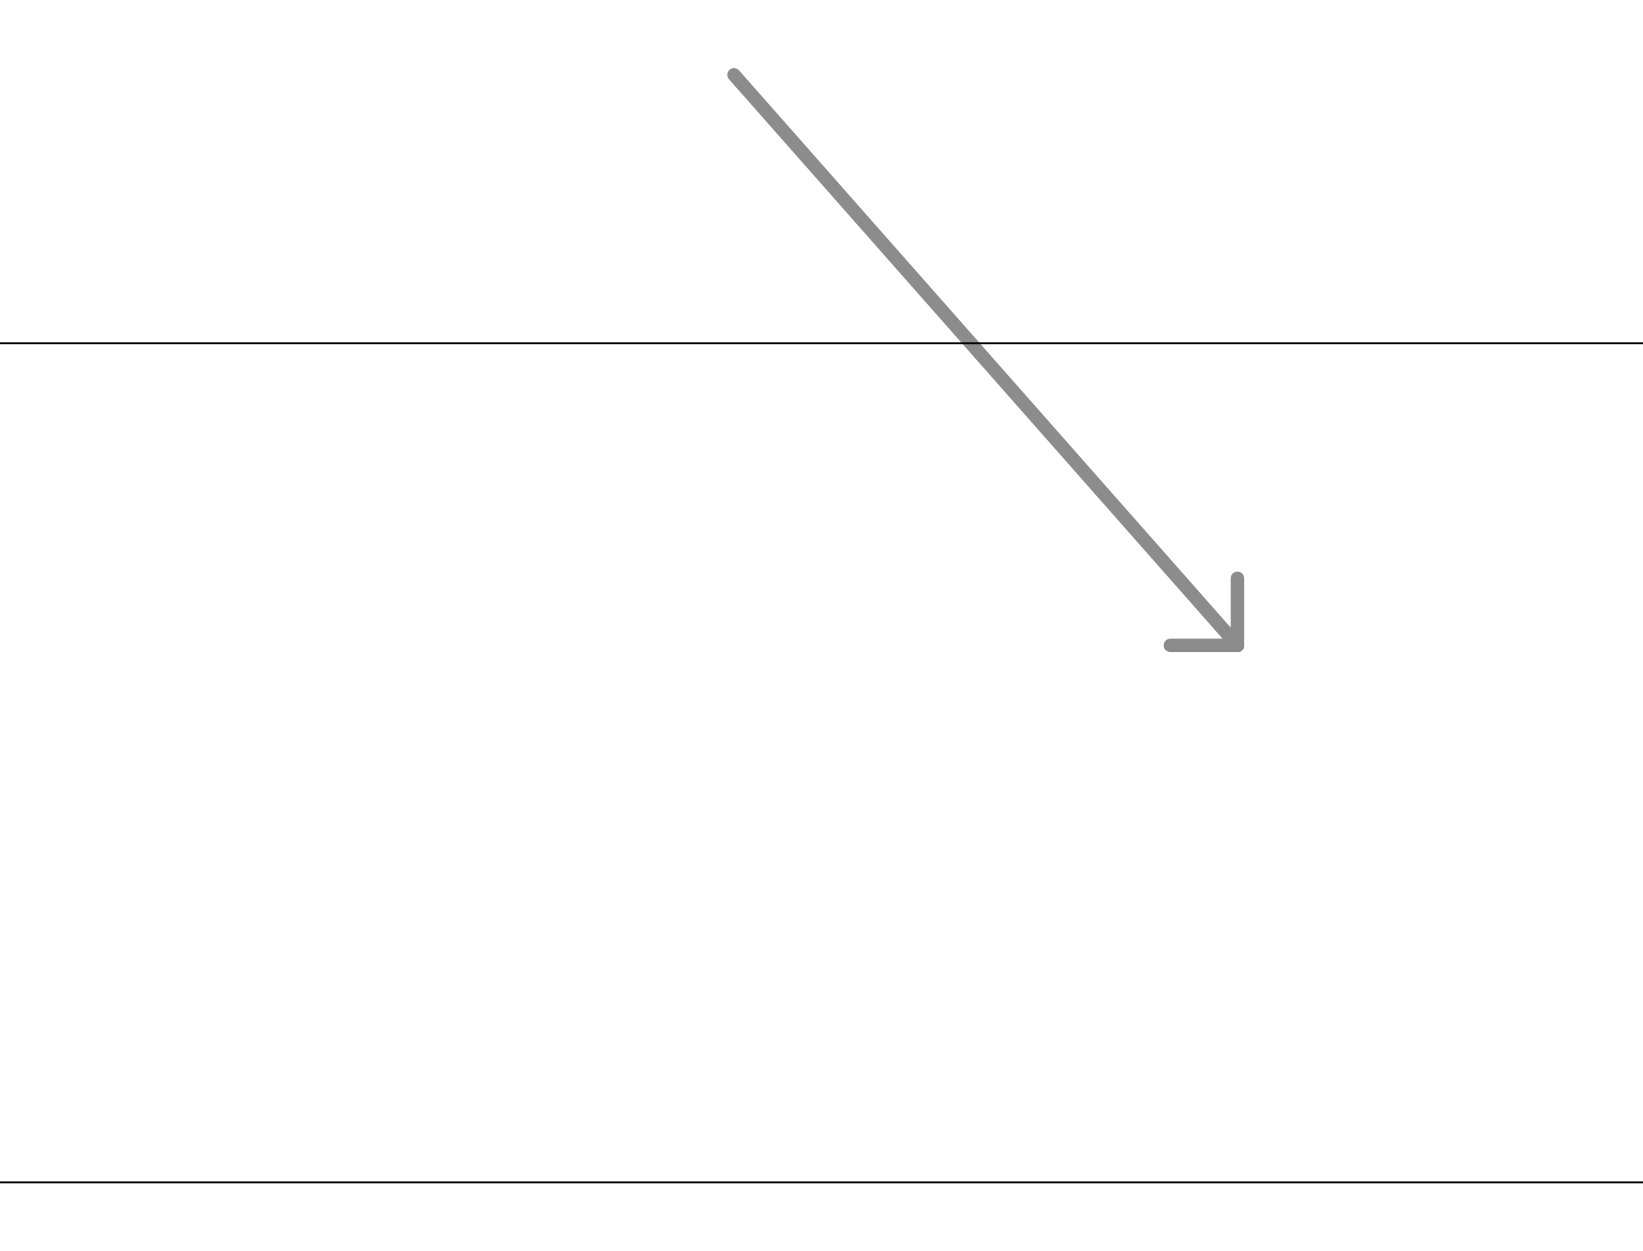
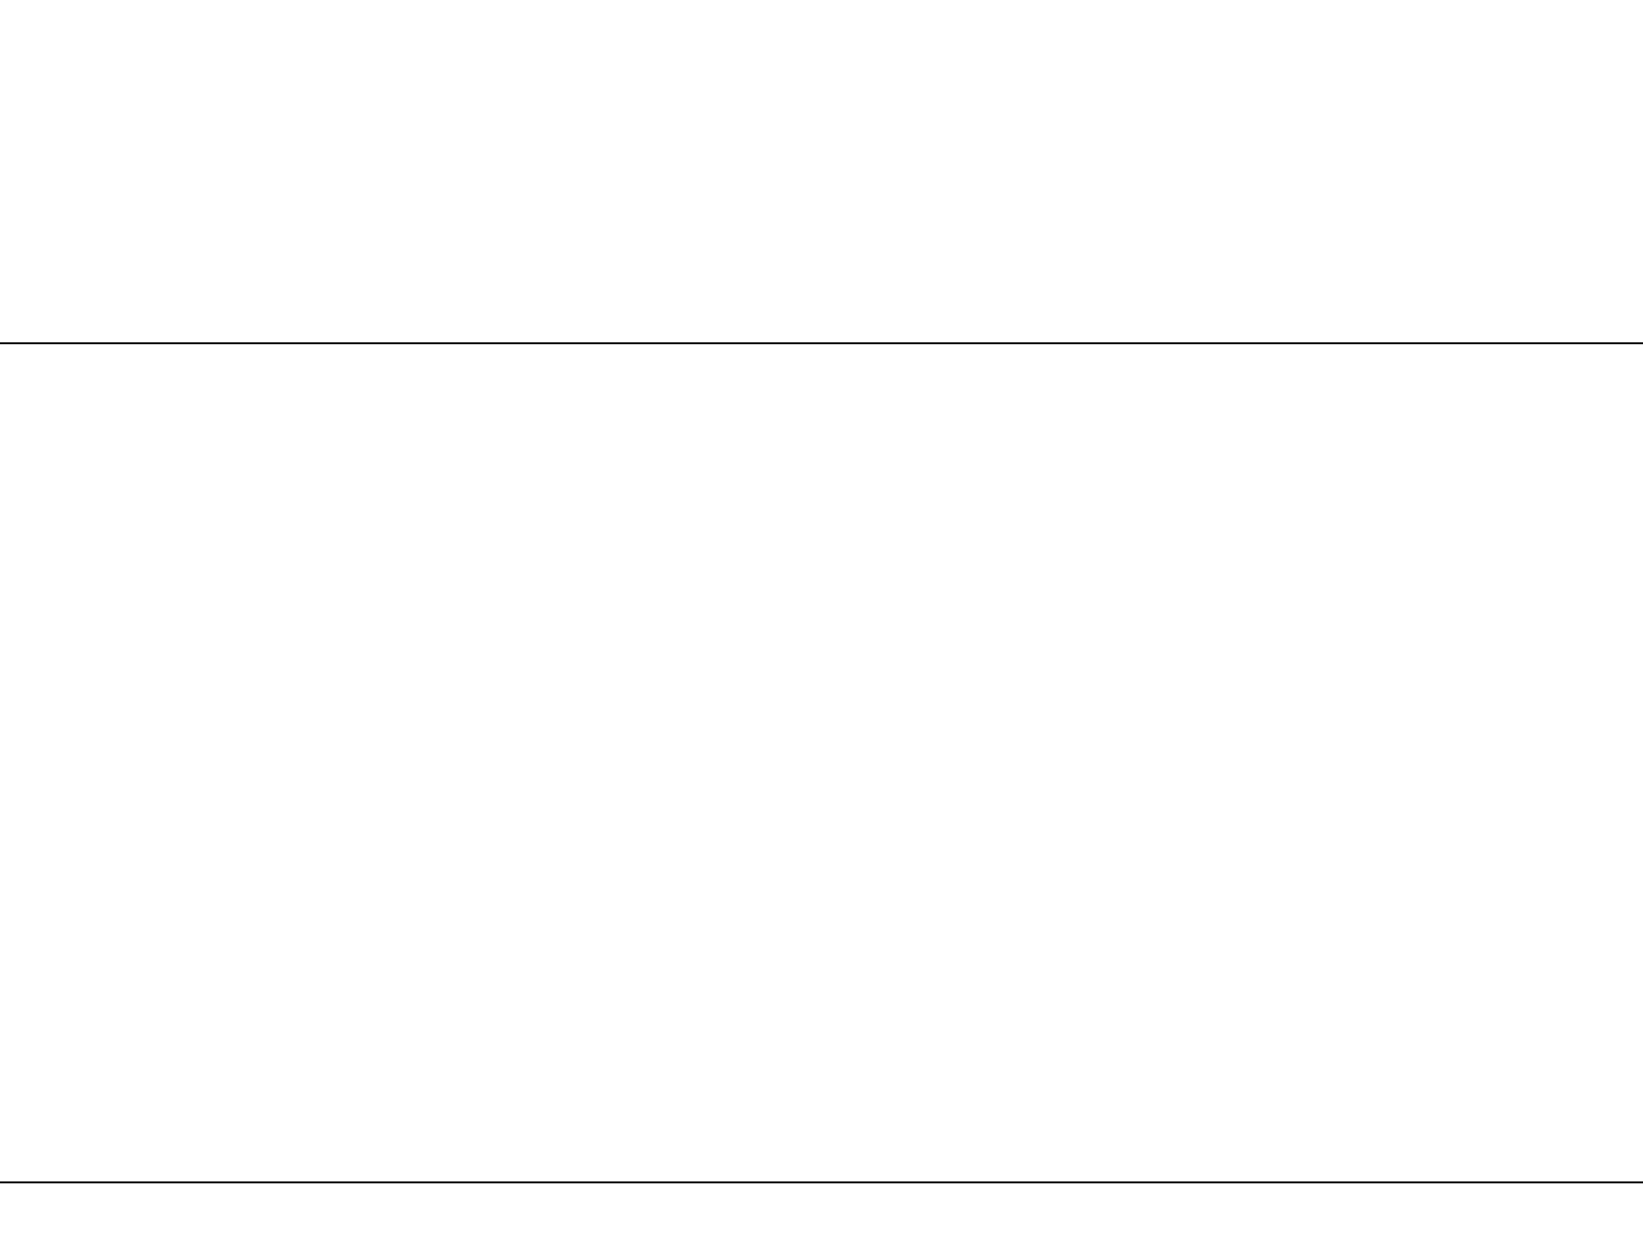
line: (733, 74) (1237, 645) -> none
line: (1237, 578) (1237, 645) -> none
line: (1237, 645) (1170, 645) (1237, 645) -> none

